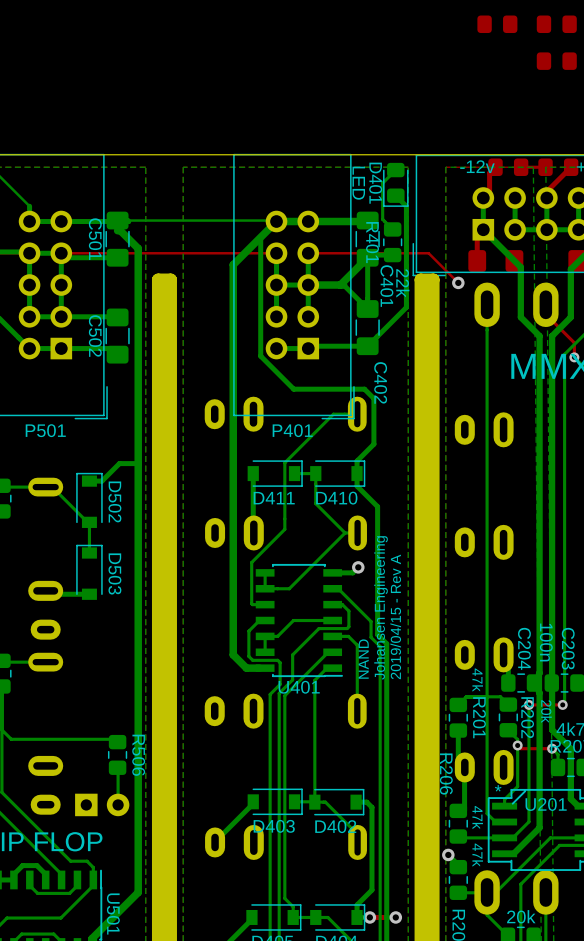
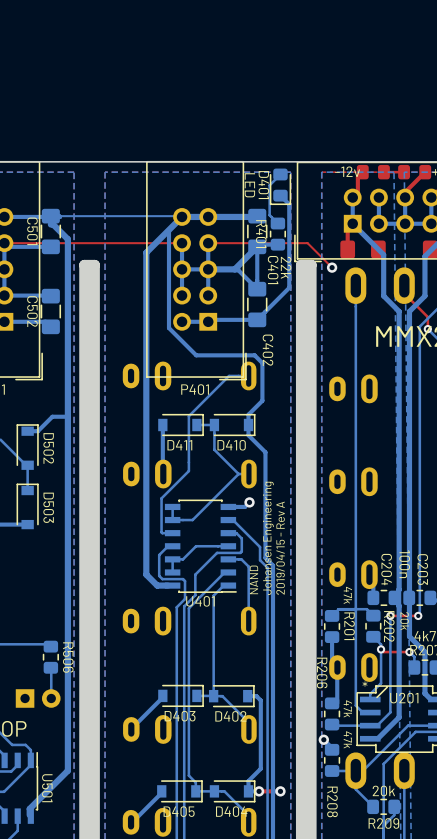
part: (497, 24) -> none
part: (556, 24) -> none
part: (556, 61) -> none

